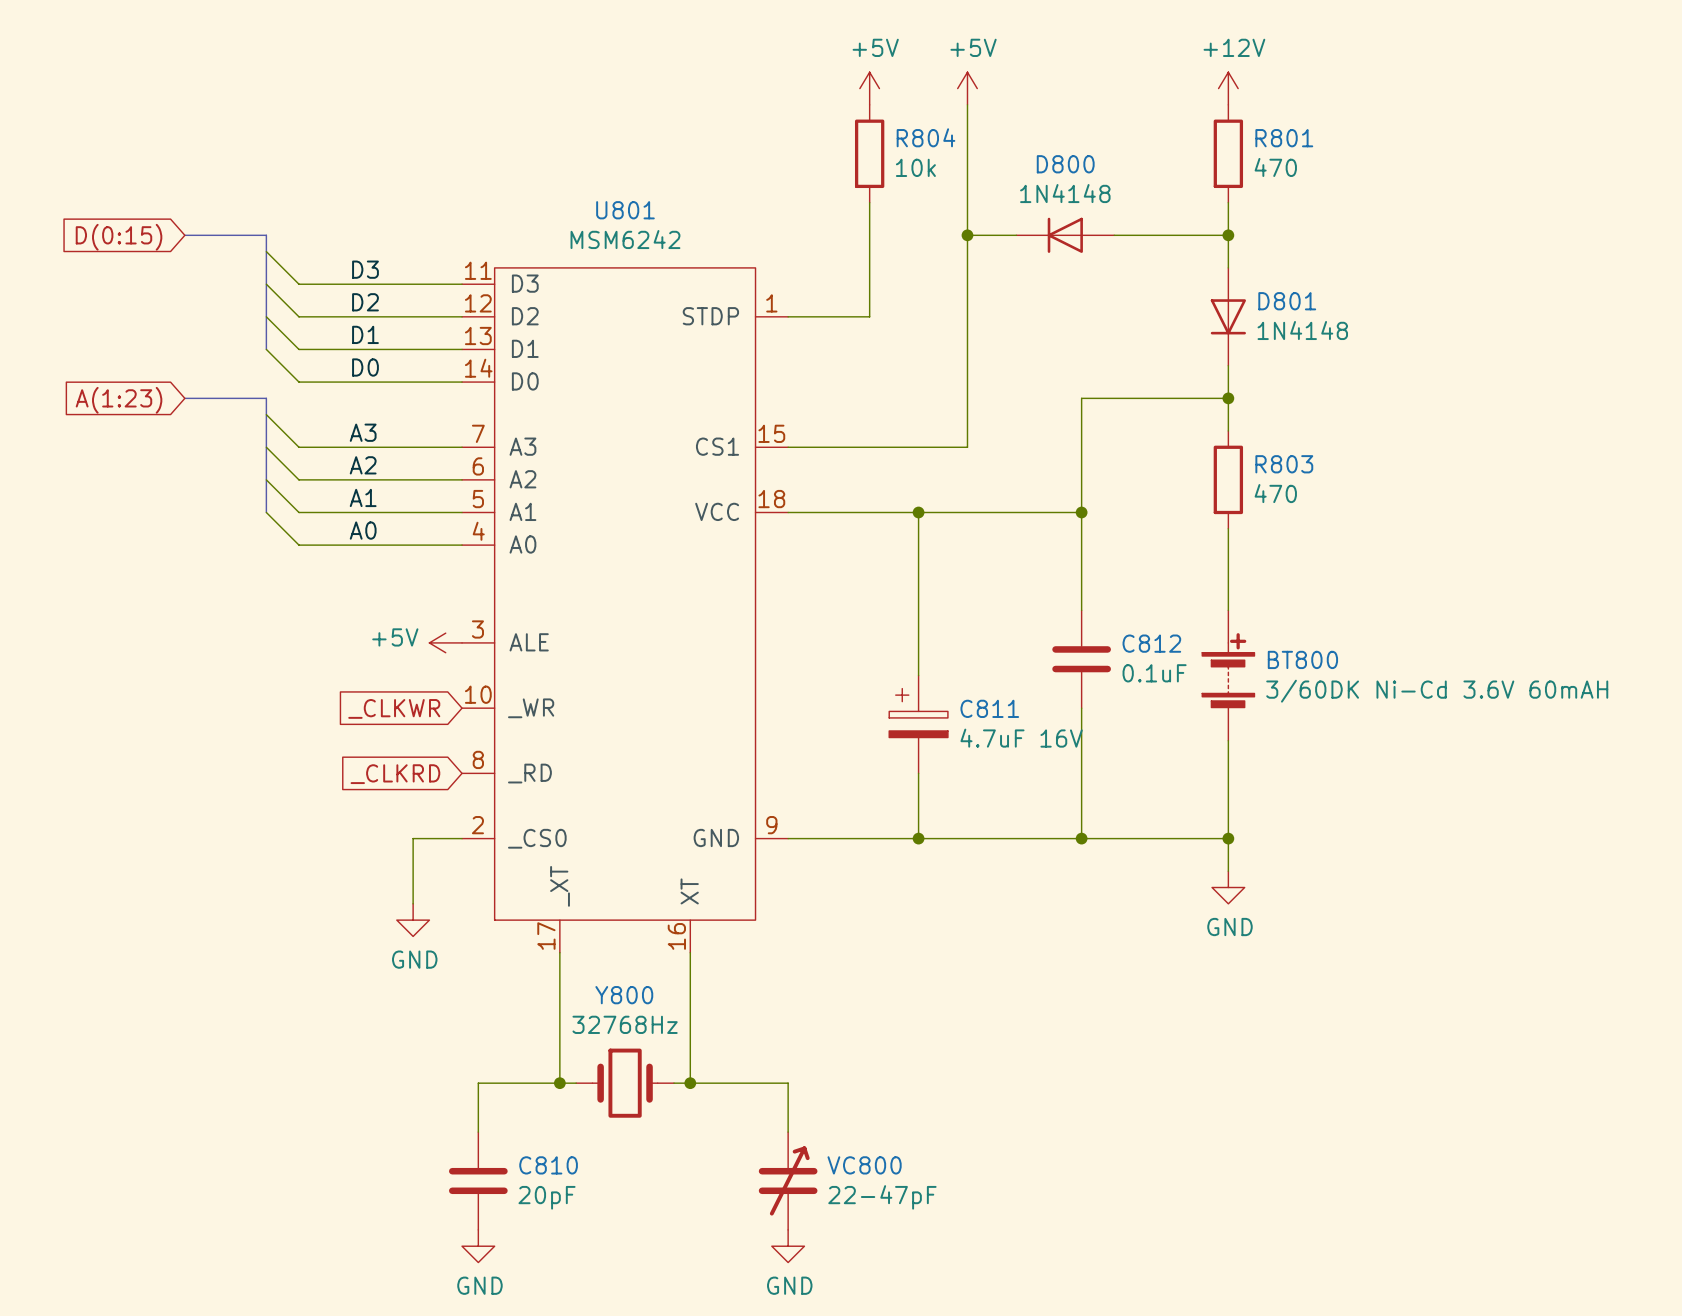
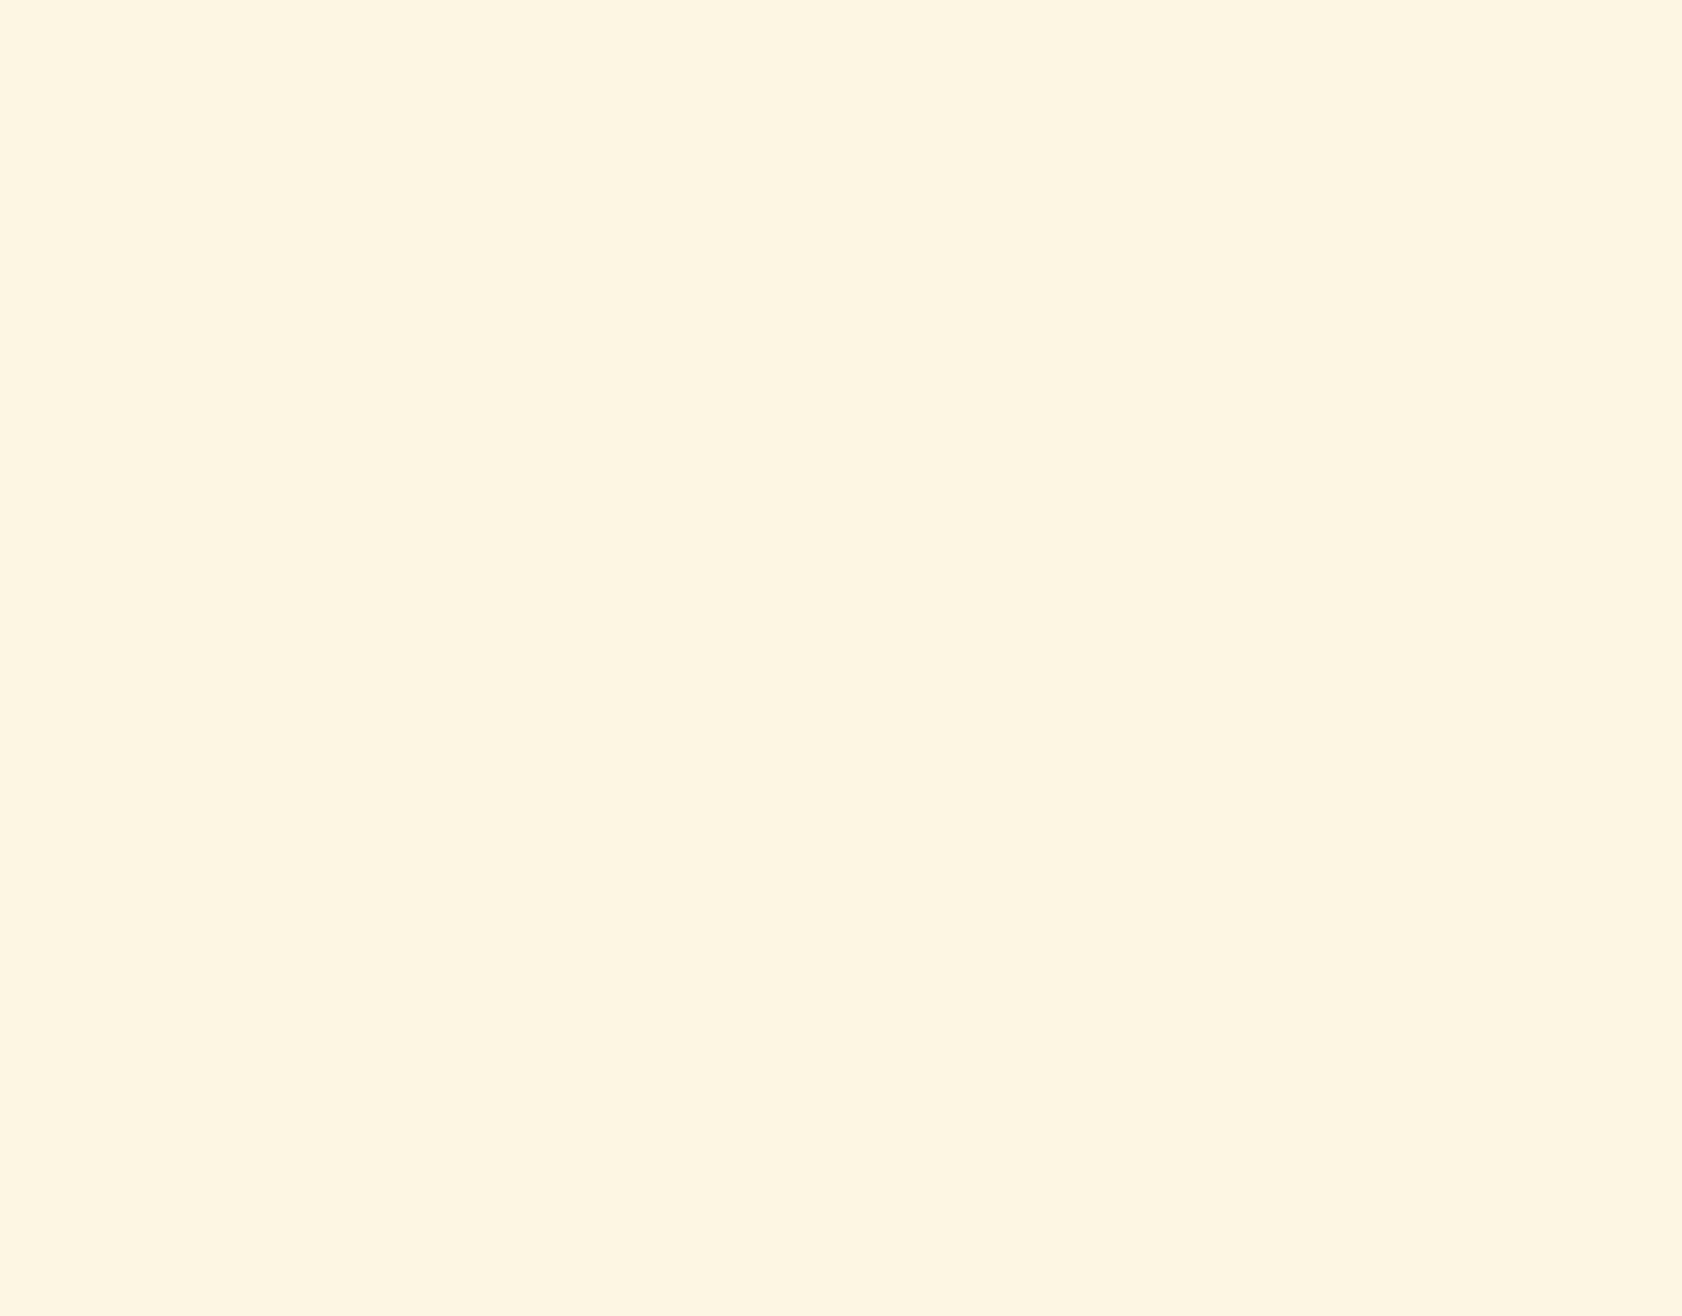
power symbol: +5V (869, 88) -> none
power symbol: +5V (967, 88) -> none
power symbol: +12V (1228, 88) -> none
wire: (967, 104) (967, 447) (788, 447) -> none
R804: 10k (869, 153) -> none
R801: 470 (1228, 153) -> none
wire: (869, 202) (869, 316) (788, 316) -> none
wire: (1228, 202) (1228, 267) -> none
bus: (184, 235) (266, 235) (266, 349) -> none
wire: (967, 235) (1016, 235) -> none
junction: (967, 235) -> none
D800: 1N4148 (1065, 235) -> none
wire: (1114, 235) (1228, 235) -> none
junction: (1228, 235) -> none
global label: D(0:15) (119, 237) -> none
wire: (266, 251) (298, 284) (462, 284) -> none
label: D3 (365, 269) -> none
wire: (266, 284) (298, 316) (462, 316) -> none
label: D2 (365, 302) -> none
wire: (266, 316) (298, 349) (462, 349) -> none
D801: 1N4148 (1228, 316) -> none
label: D1 (365, 334) -> none
wire: (266, 349) (298, 382) (462, 382) -> none
wire: (1228, 365) (1228, 430) -> none
label: D0 (365, 367) -> none
bus: (184, 398) (266, 398) (266, 512) -> none
wire: (1228, 398) (1081, 398) (1081, 610) -> none
junction: (1228, 398) -> none
global label: A(1:23) (119, 400) -> none
wire: (266, 414) (298, 447) (462, 447) -> none
label: A3 (363, 432) -> none
wire: (266, 447) (298, 479) (462, 479) -> none
label: A2 (363, 465) -> none
wire: (266, 479) (298, 512) (462, 512) -> none
R803: 470 (1228, 479) -> none
label: A1 (363, 497) -> none
wire: (266, 512) (298, 545) (462, 545) -> none
wire: (788, 512) (1081, 512) -> none
wire: (918, 512) (918, 675) -> none
junction: (918, 512) -> none
junction: (1081, 512) -> none
wire: (1228, 528) (1228, 610) -> none
label: A0 (363, 530) -> none
U801: MSM6242 (625, 610) -> none
power symbol: +5V (445, 642) -> none
C812: 0.1uF (1081, 659) -> none
BT800: 3/60DK Ni-Cd 3.6V 60mAH (1228, 675) -> none
global label: _CLKWR (394, 708) -> none
wire: (1081, 708) (1081, 838) -> none
C811: 4.7uF 16V (918, 724) -> none
wire: (1228, 740) (1228, 871) -> none
wire: (918, 773) (918, 838) -> none
global label: _CLKRD (395, 774) -> none
wire: (462, 838) (413, 838) (413, 903) -> none
wire: (788, 838) (1228, 838) -> none
junction: (918, 838) -> none
junction: (1081, 838) -> none
junction: (1228, 838) -> none
power symbol: GND (1228, 887) -> none
power symbol: GND (413, 920) -> none
wire: (559, 952) (559, 1083) -> none
wire: (690, 952) (690, 1083) -> none
junction: (559, 1083) -> none
wire: (576, 1083) (478, 1083) (478, 1132) -> none
Y800: 32768Hz (625, 1083) -> none
wire: (674, 1083) (788, 1083) (788, 1132) -> none
junction: (690, 1083) -> none
C810: 20pF (478, 1181) -> none
VC800: 22-47pF (788, 1181) -> none
power symbol: GND (478, 1246) -> none
power symbol: GND (788, 1246) -> none

